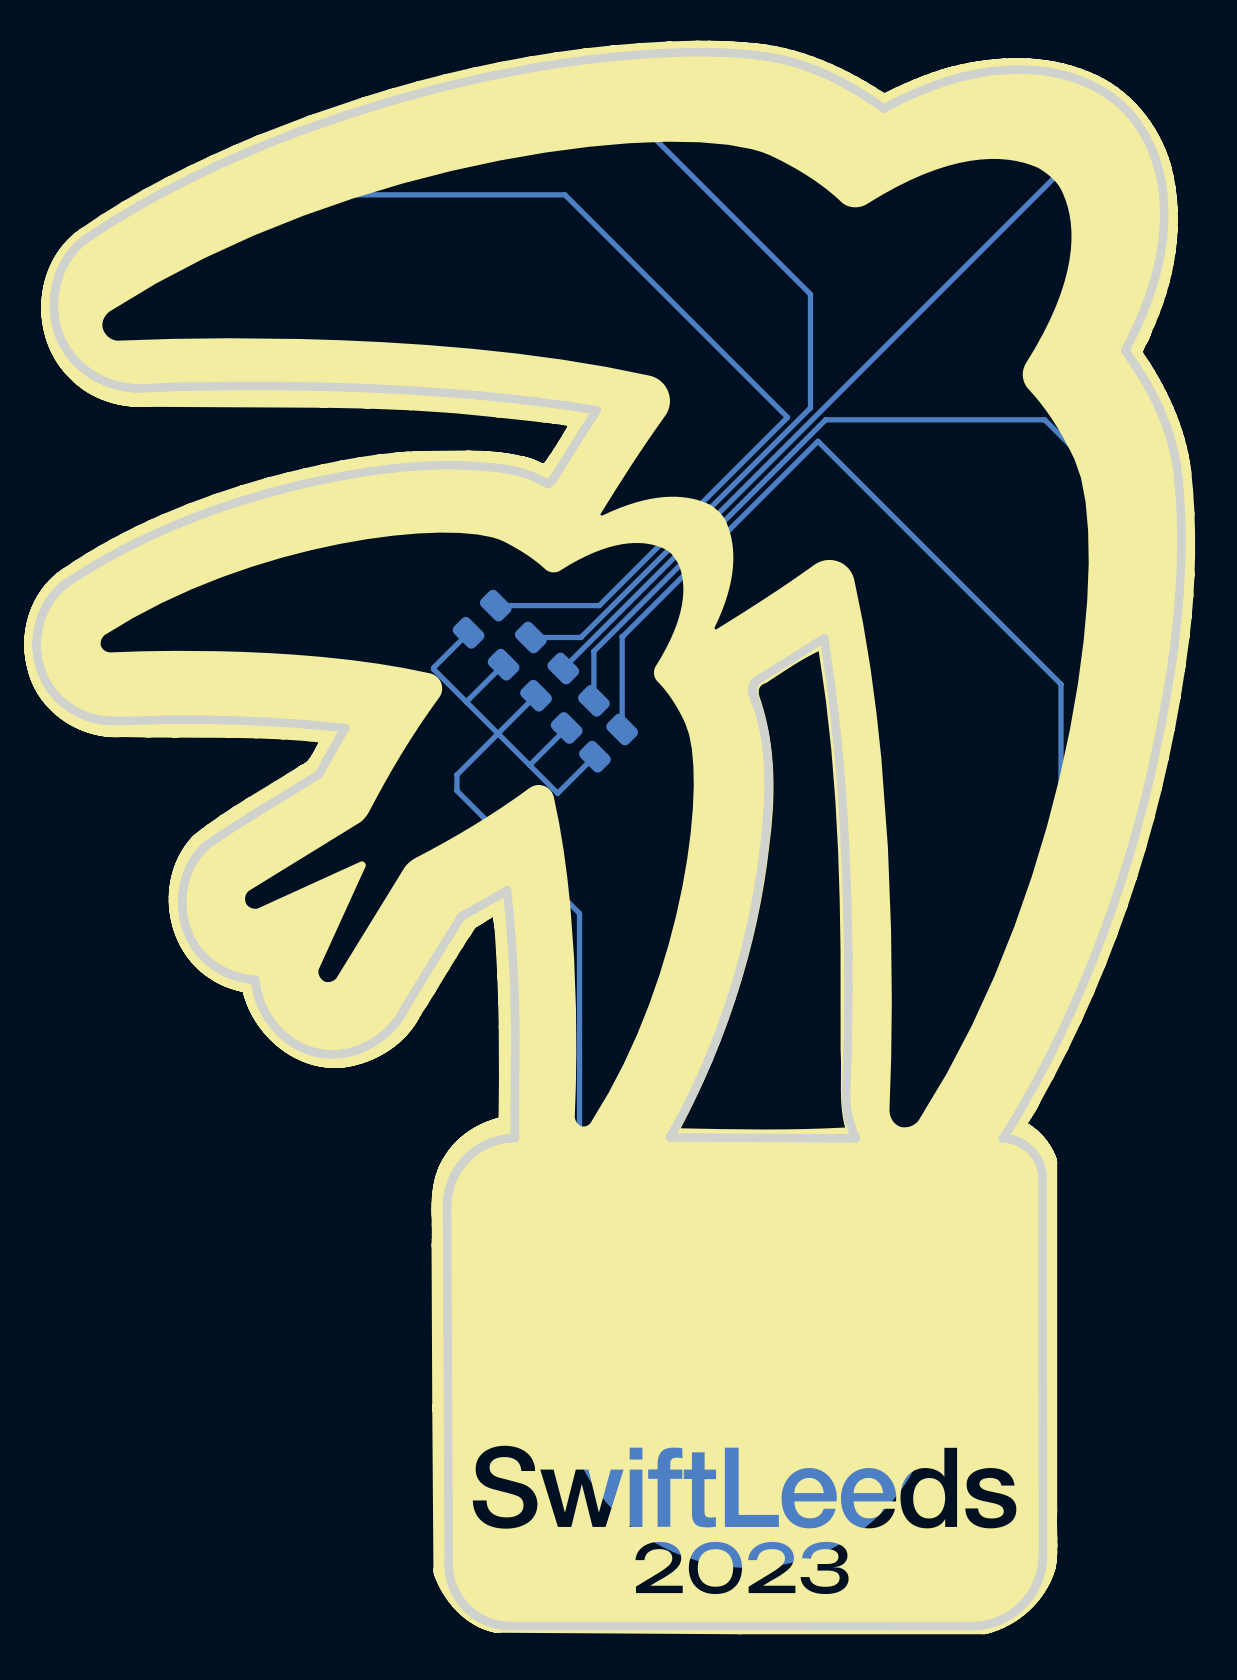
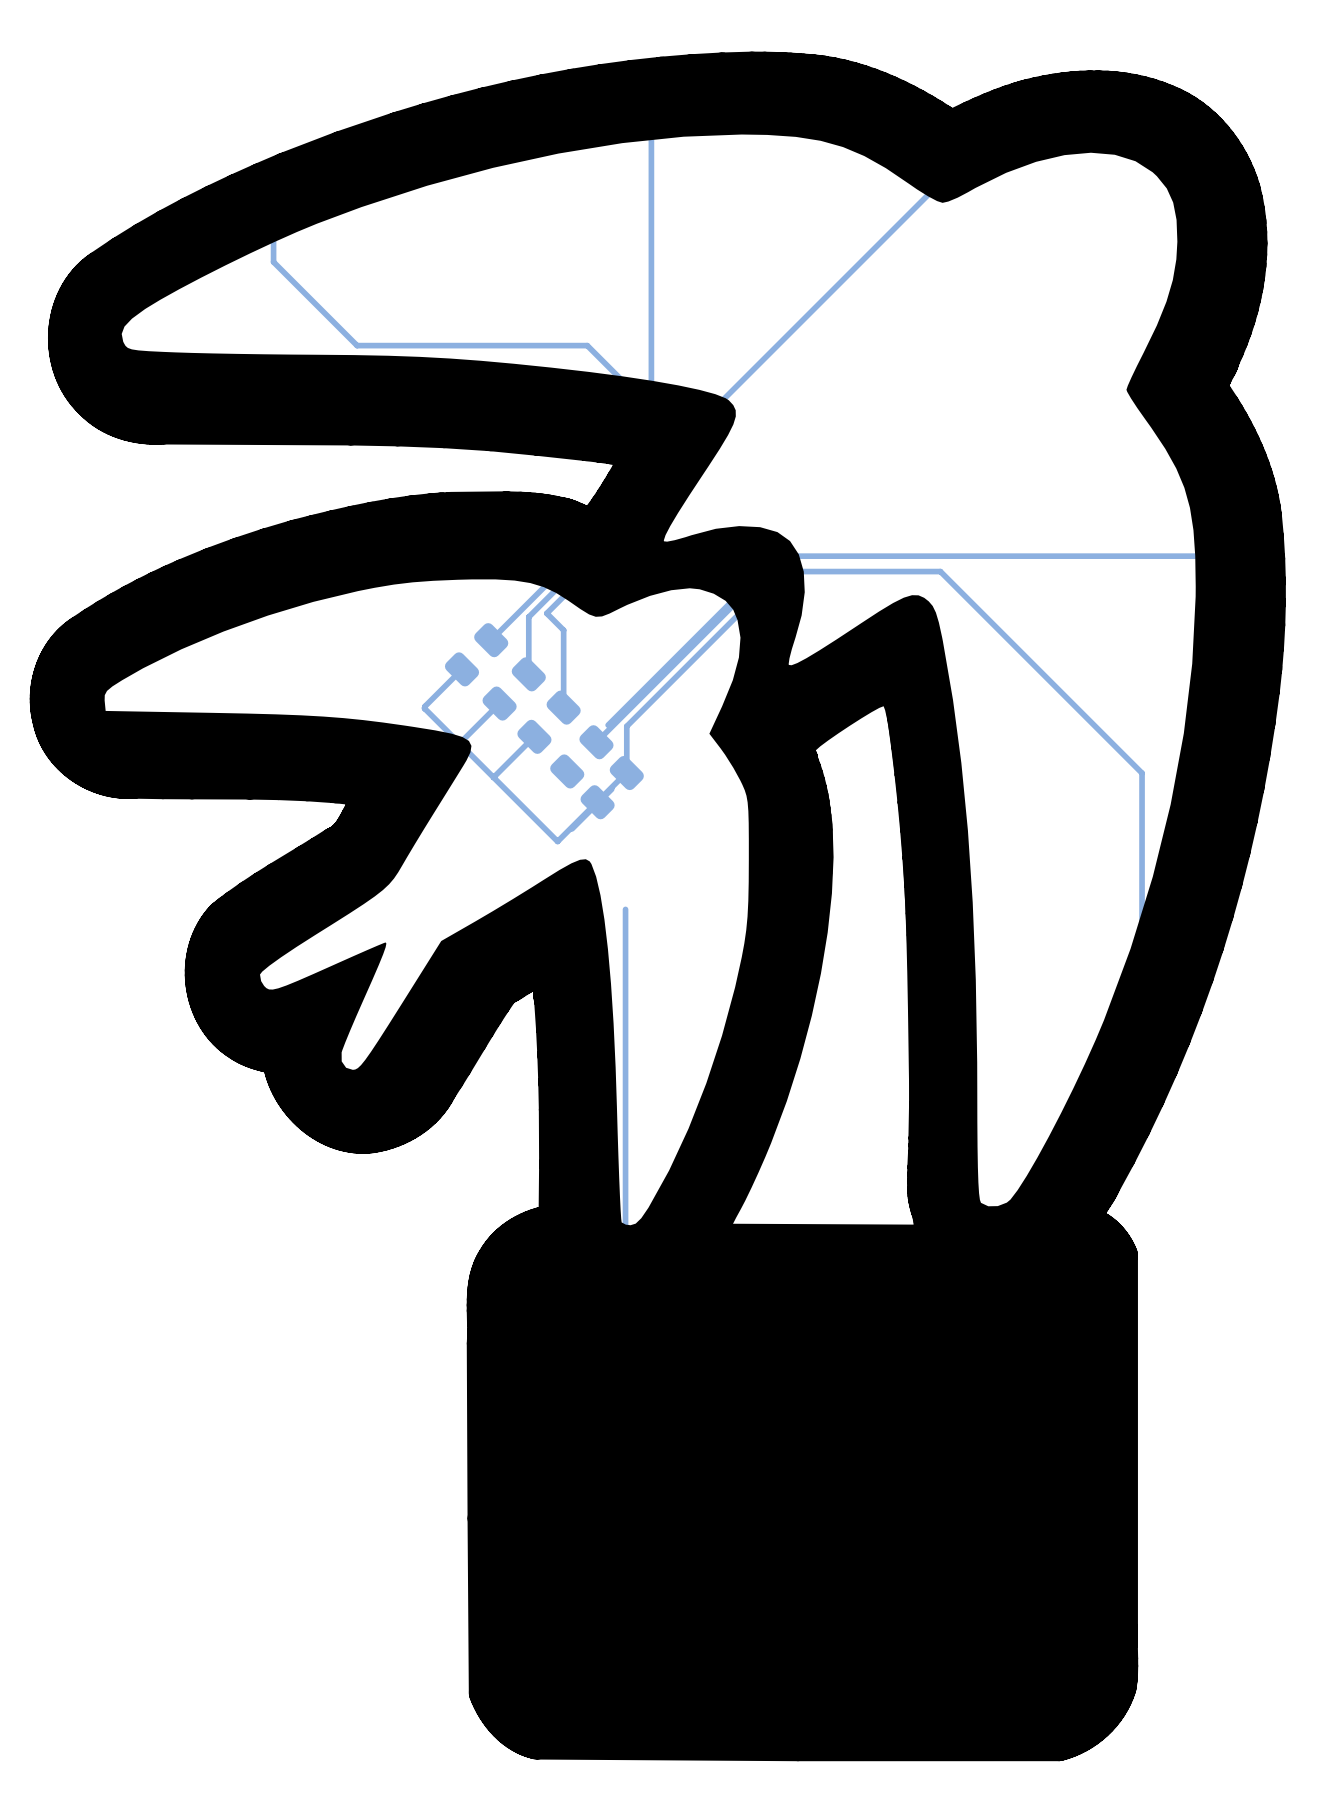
drawing shape: [36, 52, 1184, 1623] -> [36, 61, 1278, 1759]
bottom track: (607, 91) (810, 294) (810, 407) (580, 637) (530, 637) -> none
bottom track: none -> (651, 110) (651, 395) (680, 424) (680, 465) (528, 617) (528, 674)
bottom track: (1074, 119) (1062, 131) (1062, 169) (694, 537) -> none
bottom track: none -> (1152, 138) (984, 138) (690, 432) (690, 469) (546, 613) (563, 630) (563, 707)
bottom track: (251, 186) (259, 194) (564, 194) (787, 417) (599, 605) (495, 605) -> (273, 208) (273, 262) (357, 345) (587, 345) (669, 428) (669, 461) (491, 640)
bottom track: none -> (1220, 556) (782, 556) (596, 742)
bottom track: (1135, 510) (1044, 419) (825, 419) (593, 651) (593, 700) -> none
part position: (482, 619) -> (514, 688)
bottom track: (468, 632) (434, 667) (434, 669) -> (462, 669) (425, 706) (425, 708)
part position: (517, 651) -> (549, 722)
bottom track: none -> (424, 708) (557, 841) (625, 773)
bottom track: (503, 664) (466, 701) -> (499, 703) (459, 743)
bottom track: (433, 669) (557, 793) (594, 756) -> none
part position: (549, 682) -> (581, 756)
bottom track: (535, 695) (497, 733) -> (534, 736) (493, 777)
bottom track: (1061, 713) (1061, 684) (817, 441) (622, 636) (622, 729) -> (1142, 773) (940, 571) (781, 571) (626, 726) (626, 773)
part position: (580, 714) -> (612, 787)
bottom track: (497, 733) (456, 774) (456, 790) (579, 913) -> (625, 909) (625, 987)
part position: (608, 743) -> (476, 654)
drawing: [794, 1477, 824, 1494] -> none
drawing: [853, 1477, 884, 1494] -> none
drawing: [913, 1478, 946, 1519] -> none
drawing: [697, 1549, 734, 1587] -> none

